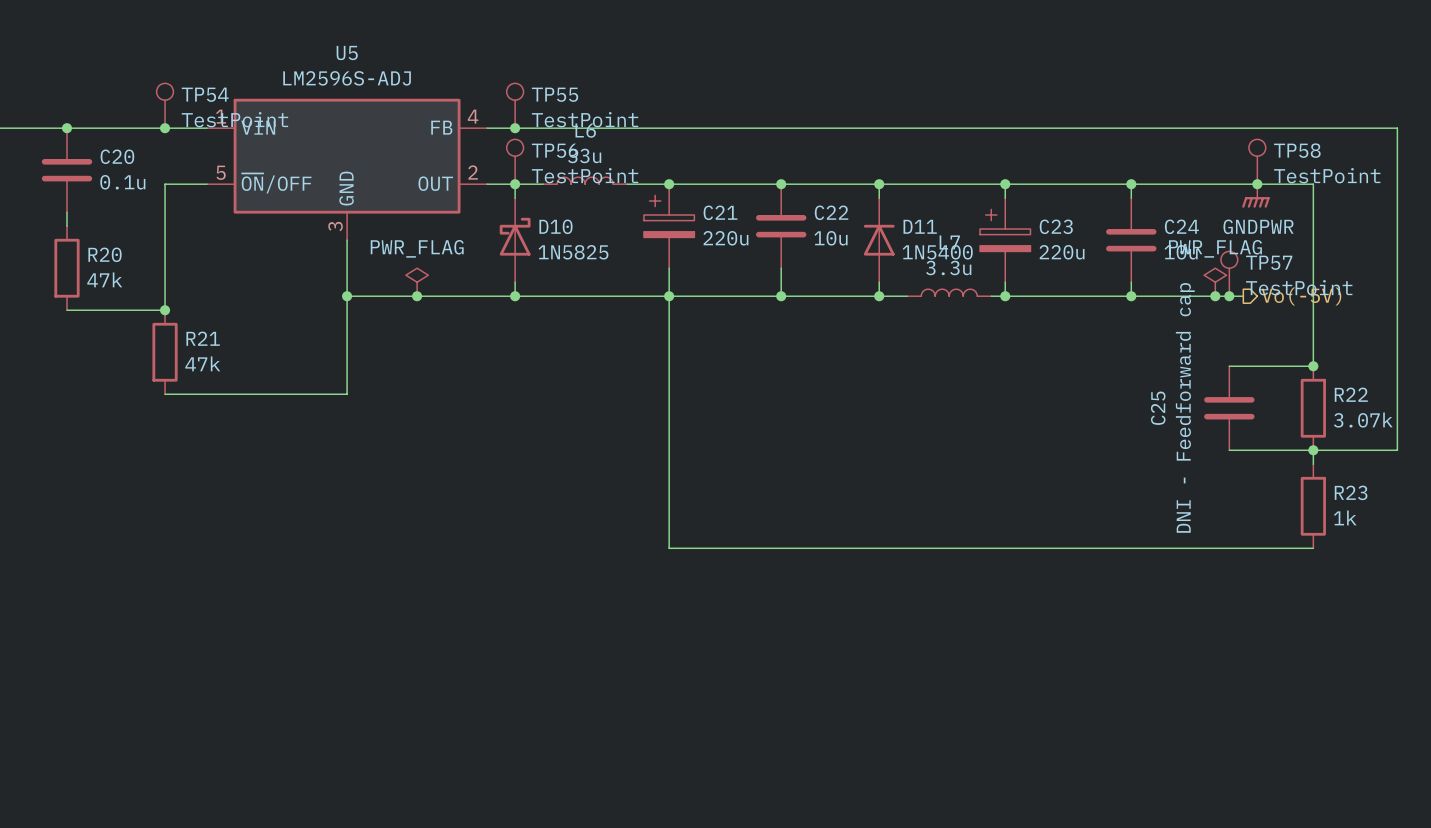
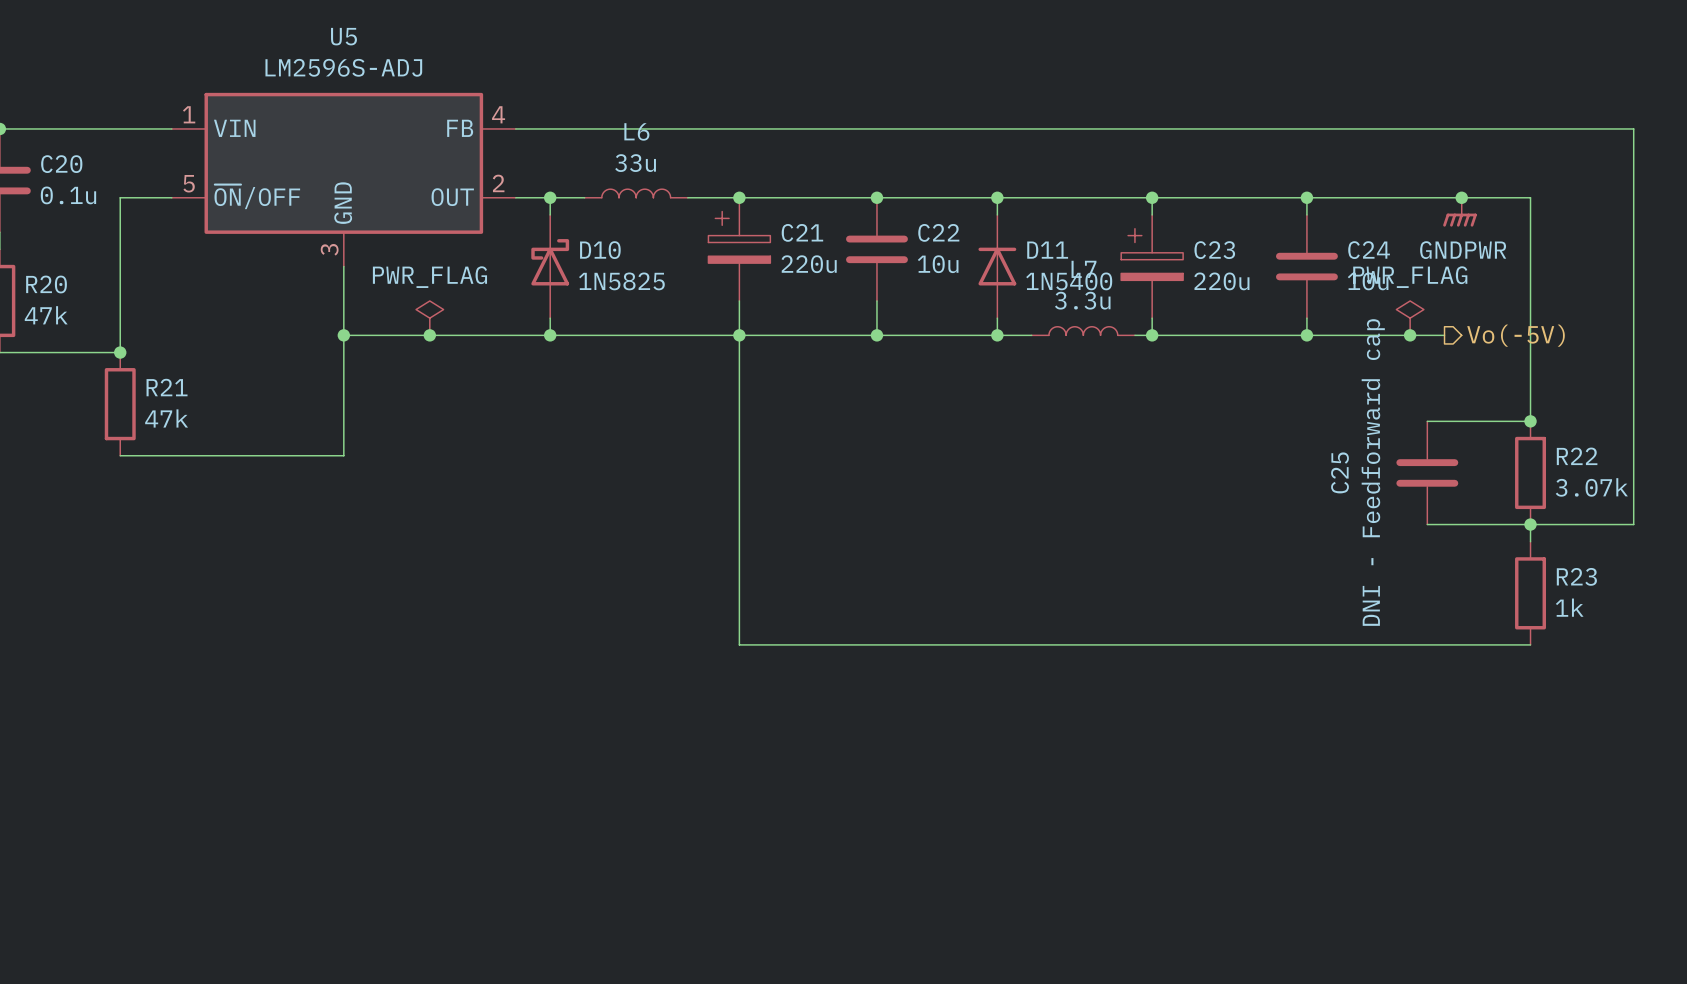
TP54: TestPoint (165, 105) -> none
TP55: TestPoint (515, 105) -> none
junction: (165, 128) -> none
junction: (515, 128) -> none
TP56: TestPoint (515, 161) -> none
TP58: TestPoint (1257, 161) -> none
TP57: TestPoint (1229, 273) -> none
junction: (1229, 296) -> none

